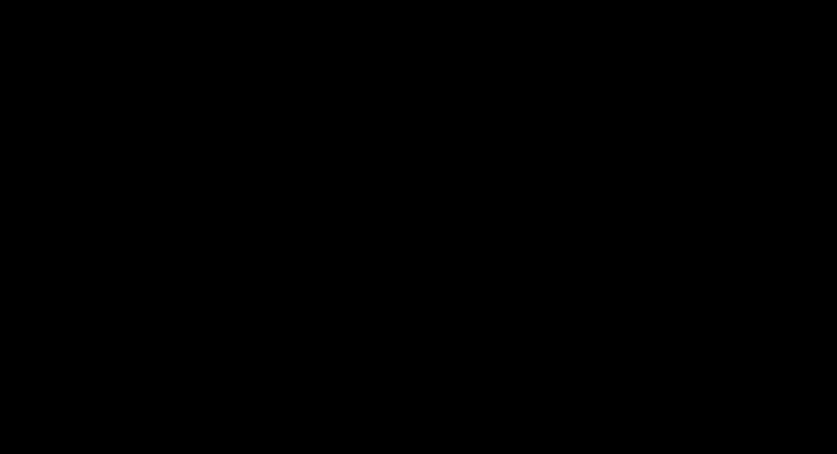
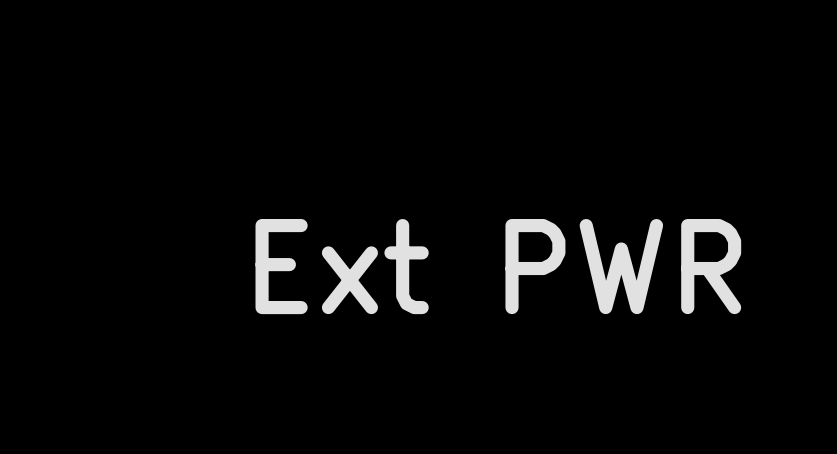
text: none -> Ext PWR (498, 266)

